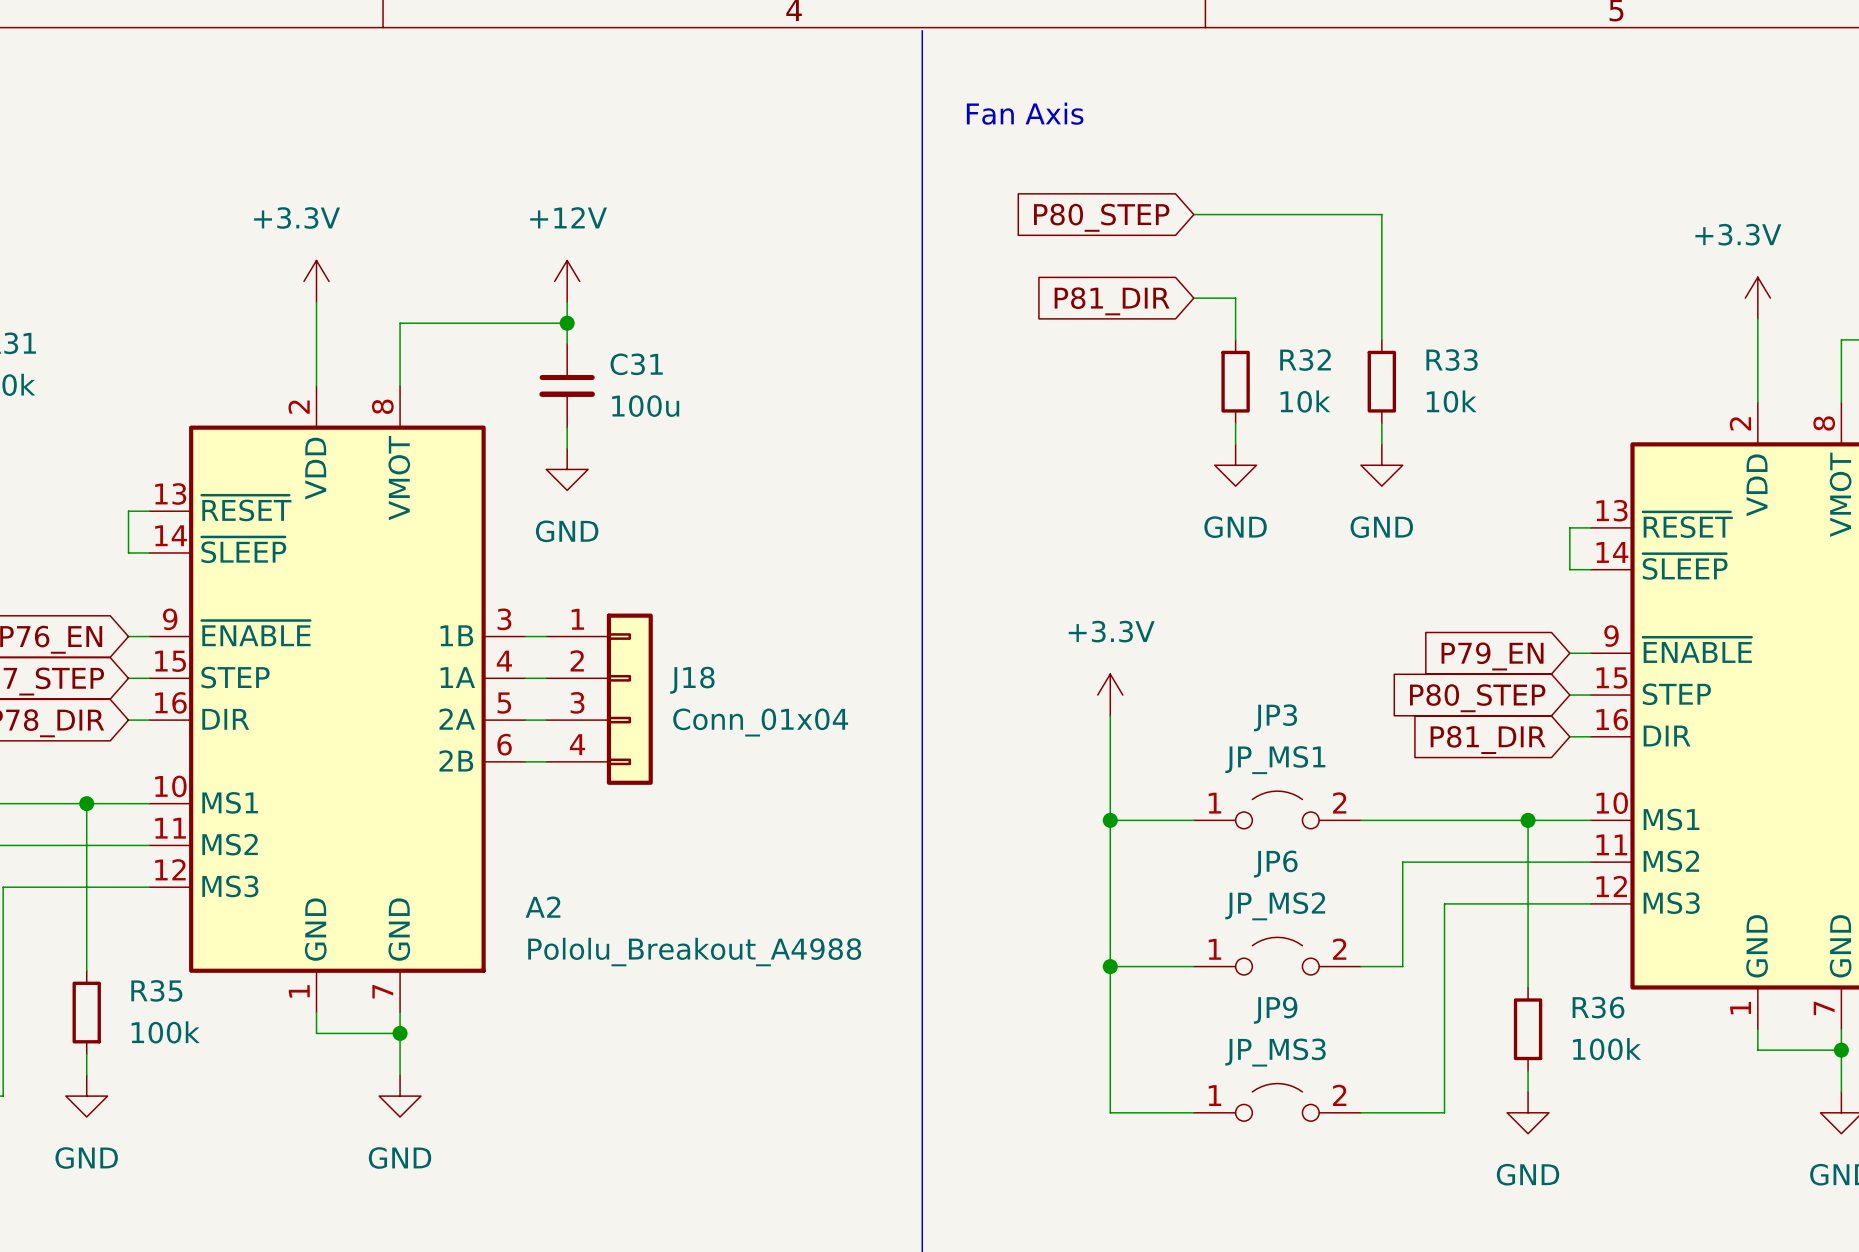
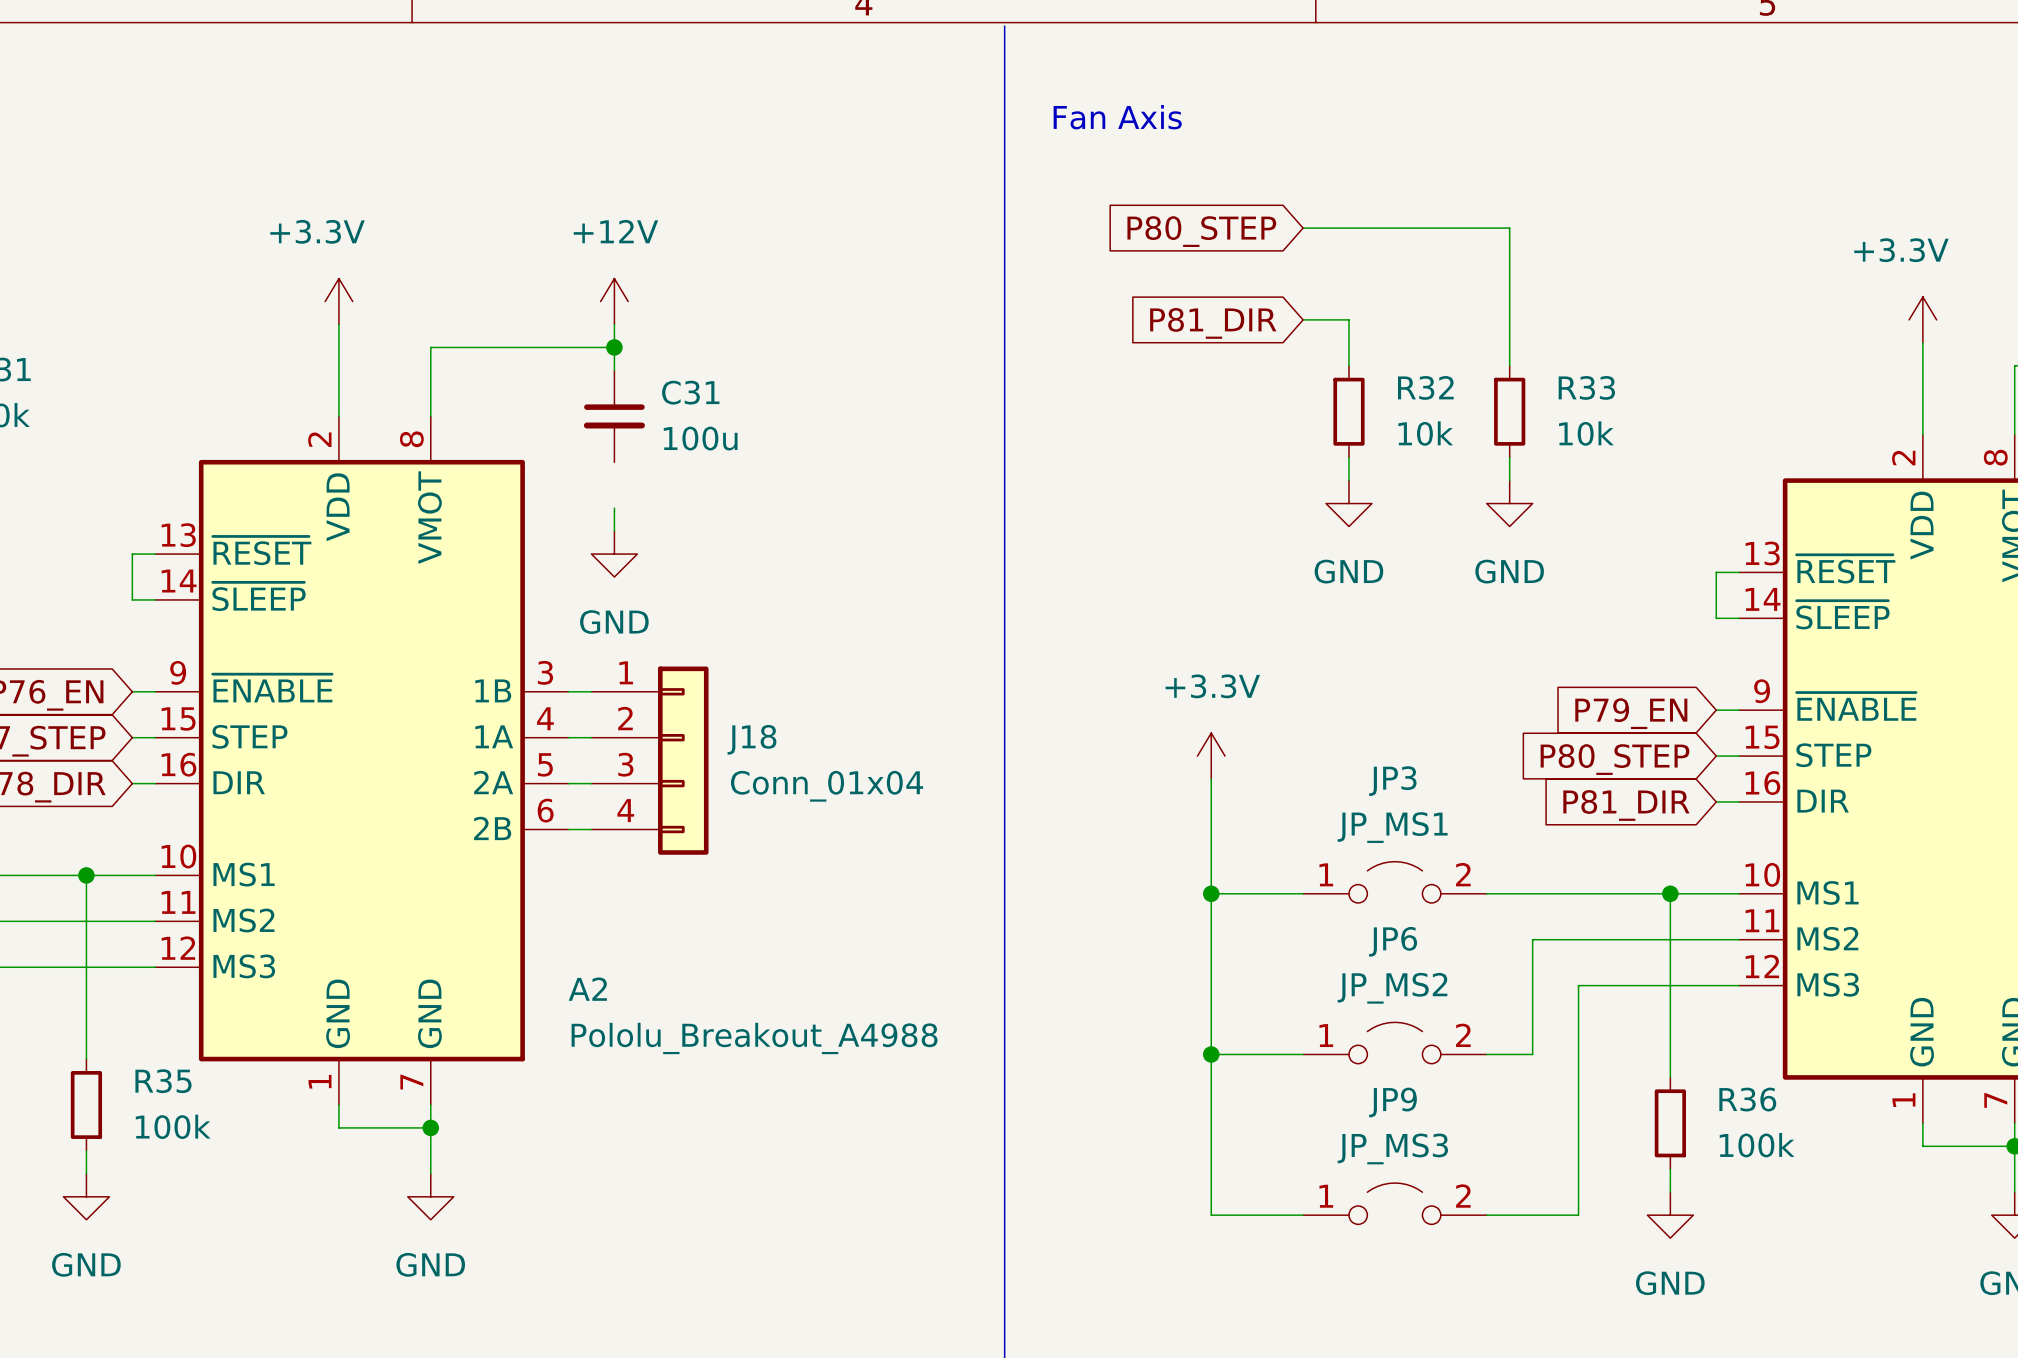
wire: (567, 427) (567, 448) -> (614, 508) (614, 531)
power symbol position: GND (567, 469) -> GND (614, 554)

